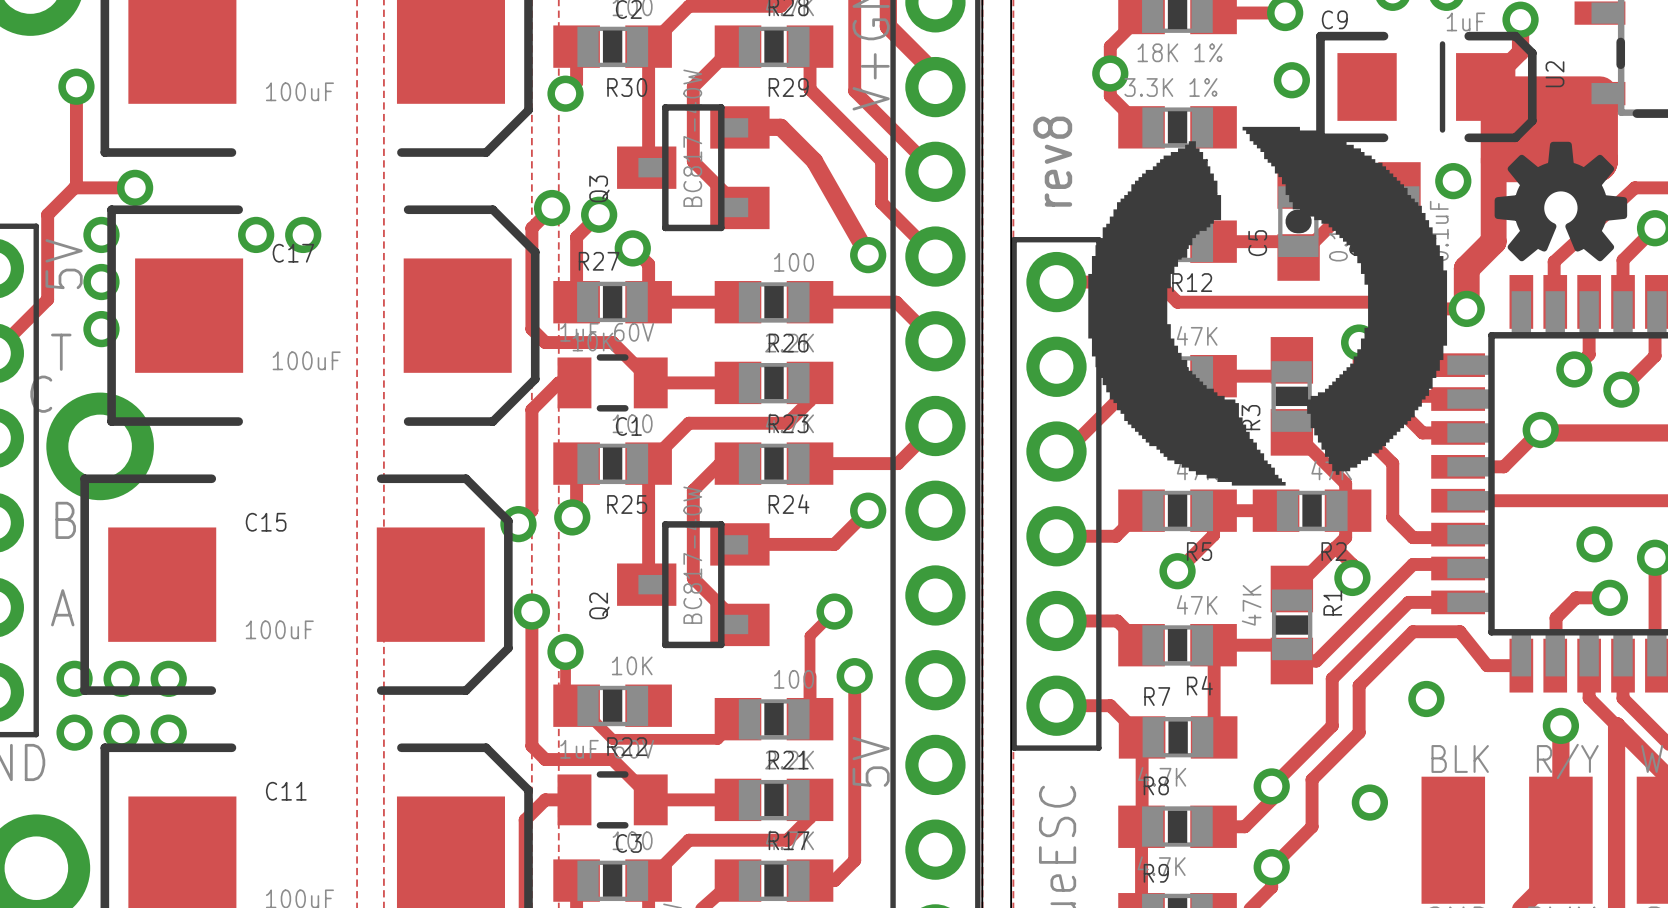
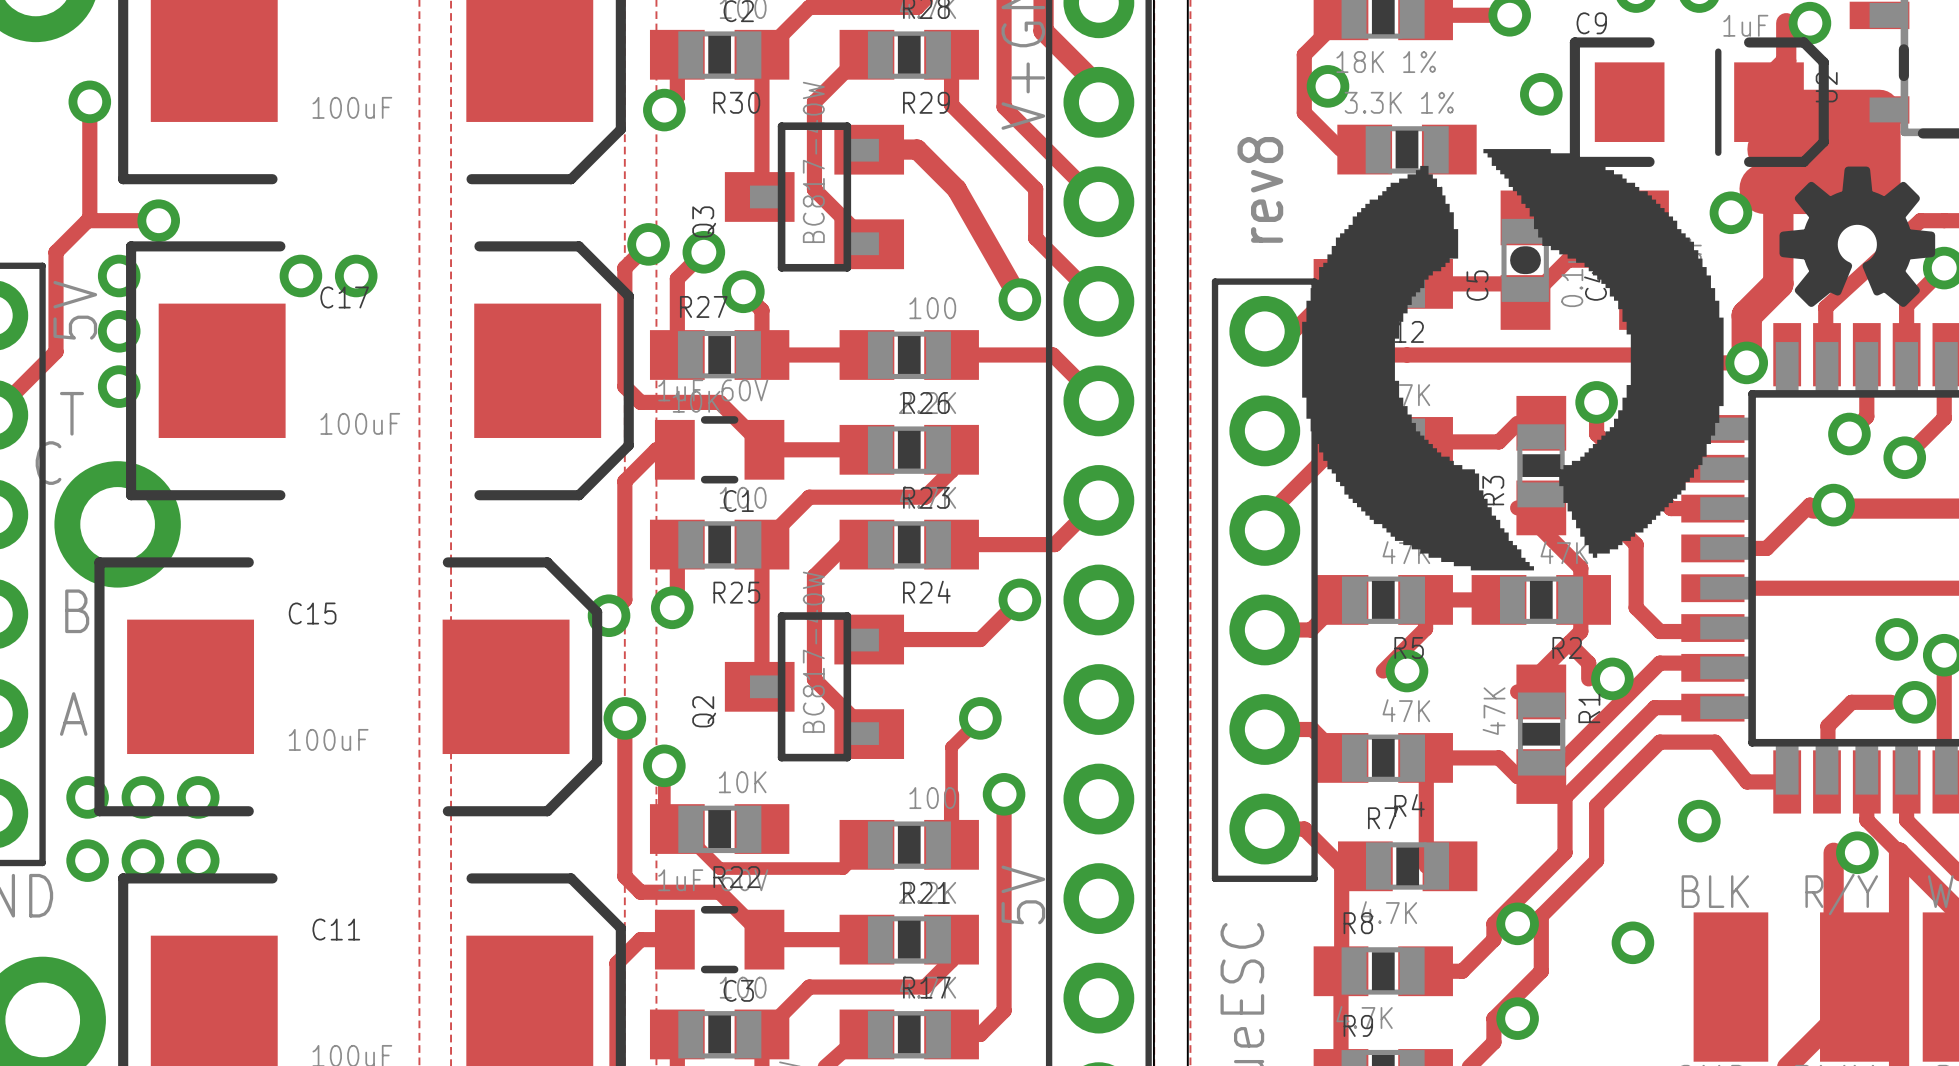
via position: (1520, 19) -> (1809, 23)
via position: (1110, 73) -> (1327, 86)
via position: (1291, 80) -> (1541, 94)
C9 position: (1426, 86) -> (1699, 102)
track: (1512, 93) (1492, 93) (1485, 86) (1493, 94) (1493, 241) (1466, 268) (1466, 308) -> (1776, 109) (1769, 102) (1778, 111) (1778, 283) (1746, 315) (1746, 362) (1723, 362)
part position: (1177, 127) -> (1407, 149)
text position: rev8 (1052, 161) -> rev8 (1260, 189)
via position: (1453, 181) -> (1730, 212)
drawing position: (1560, 201) -> (1857, 236)
drawing position: (1267, 306) -> (1512, 359)
via position: (1466, 308) -> (1746, 362)
R3 position: (1291, 396) -> (1541, 465)
via position: (1540, 429) -> (1833, 505)
part position: (1056, 493) -> (1264, 580)
via position: (1594, 544) -> (1896, 639)
via position: (1177, 571) -> (1407, 671)
via position: (1352, 577) -> (1612, 678)
via position: (1609, 597) -> (1914, 702)
R1 position: (1291, 625) -> (1541, 734)
via position: (1426, 698) -> (1699, 821)
via position: (1560, 725) -> (1857, 852)
R7 position: (1178, 737) -> (1407, 866)
via position: (1271, 786) -> (1517, 923)
via position: (1369, 802) -> (1632, 942)
part position: (1453, 840) -> (1730, 987)
part position: (1560, 840) -> (1857, 987)
via position: (1271, 867) -> (1517, 1018)

